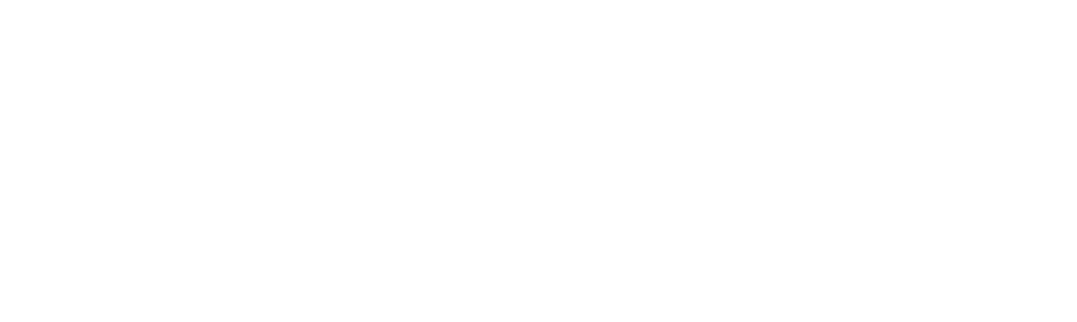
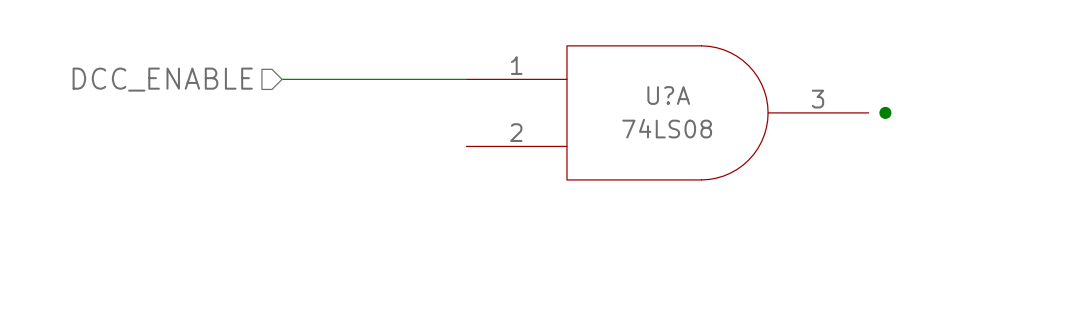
hierarchical label: none -> DCC_ENABLE (162, 79)
wire: none -> (282, 79) (466, 79)
U?A: none -> 74LS08 (667, 112)
junction: none -> (885, 112)

